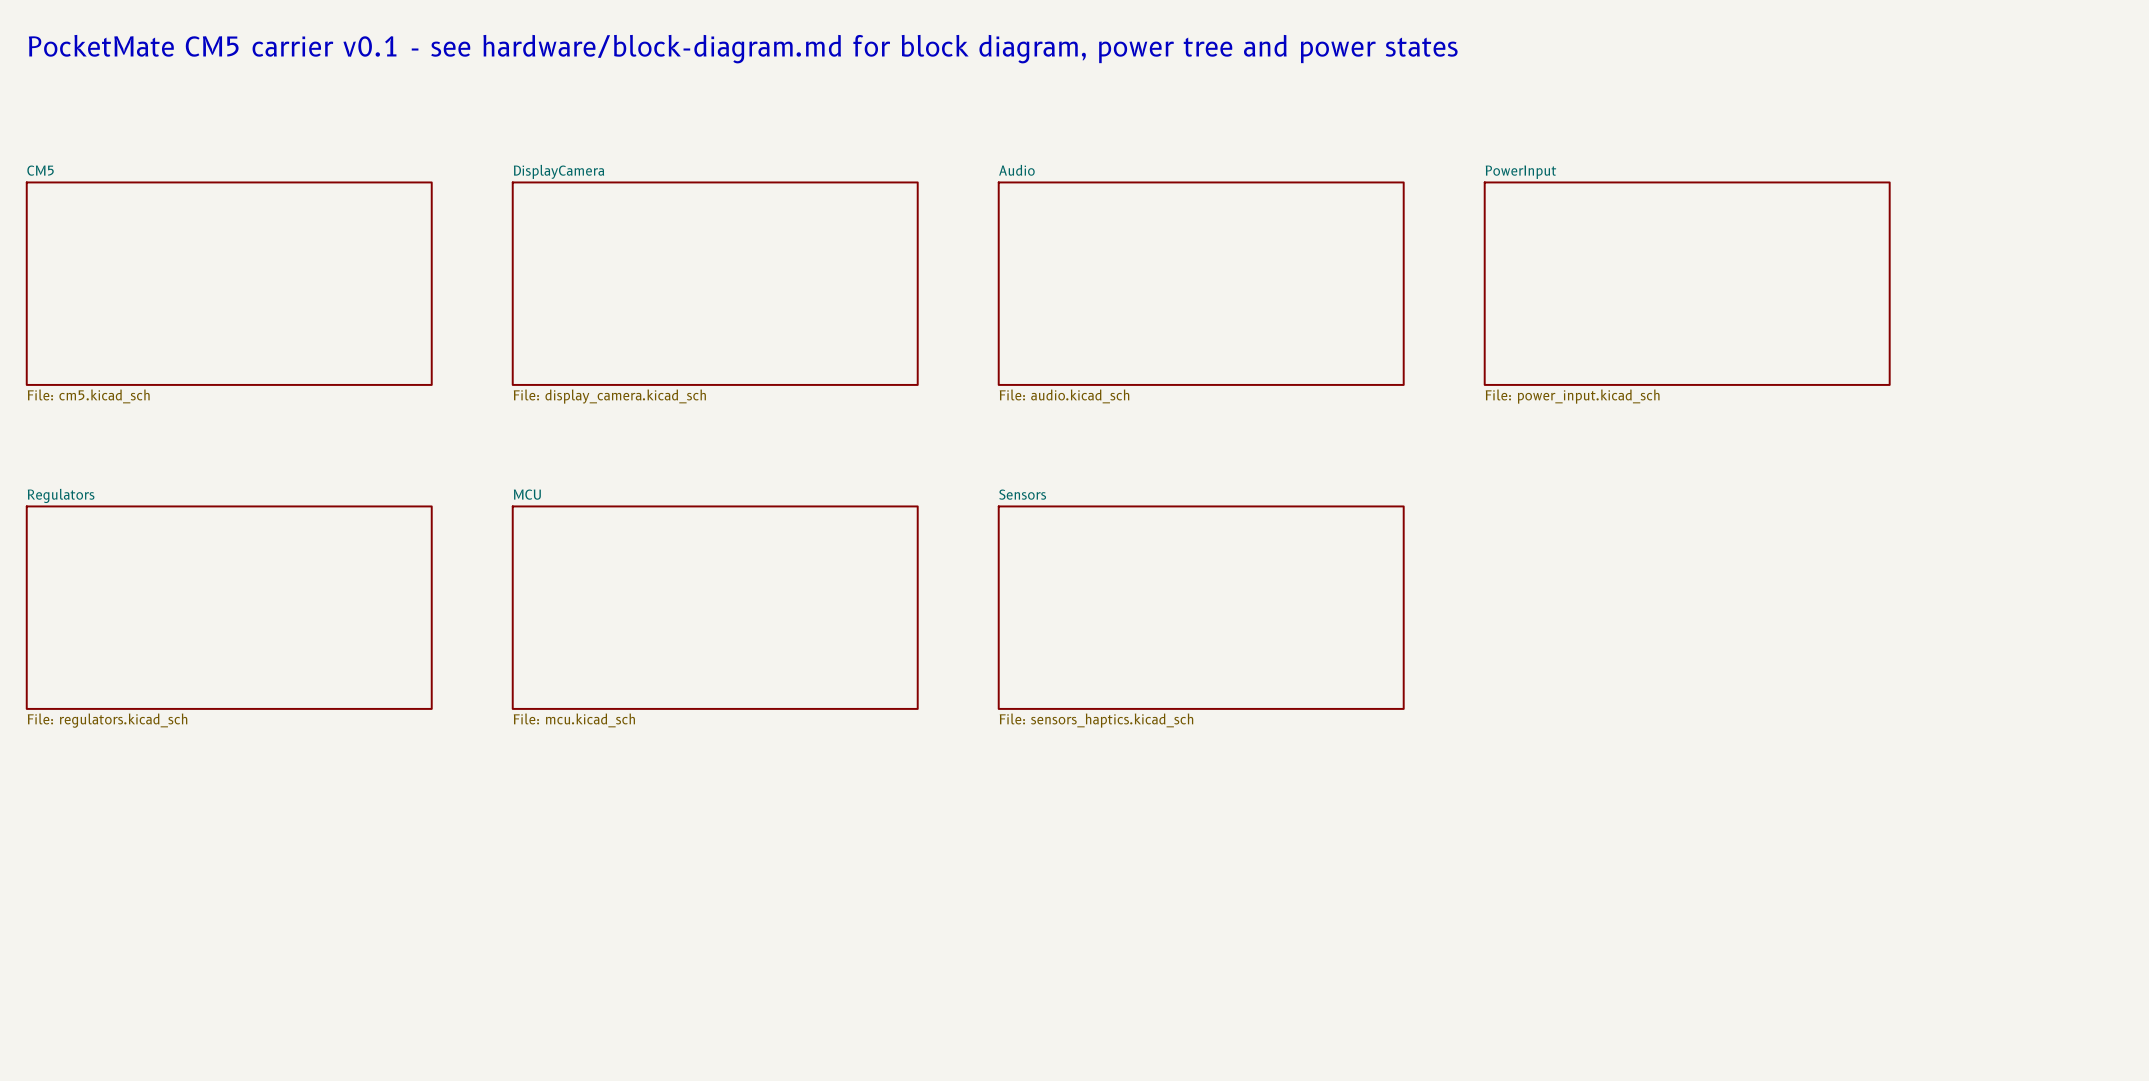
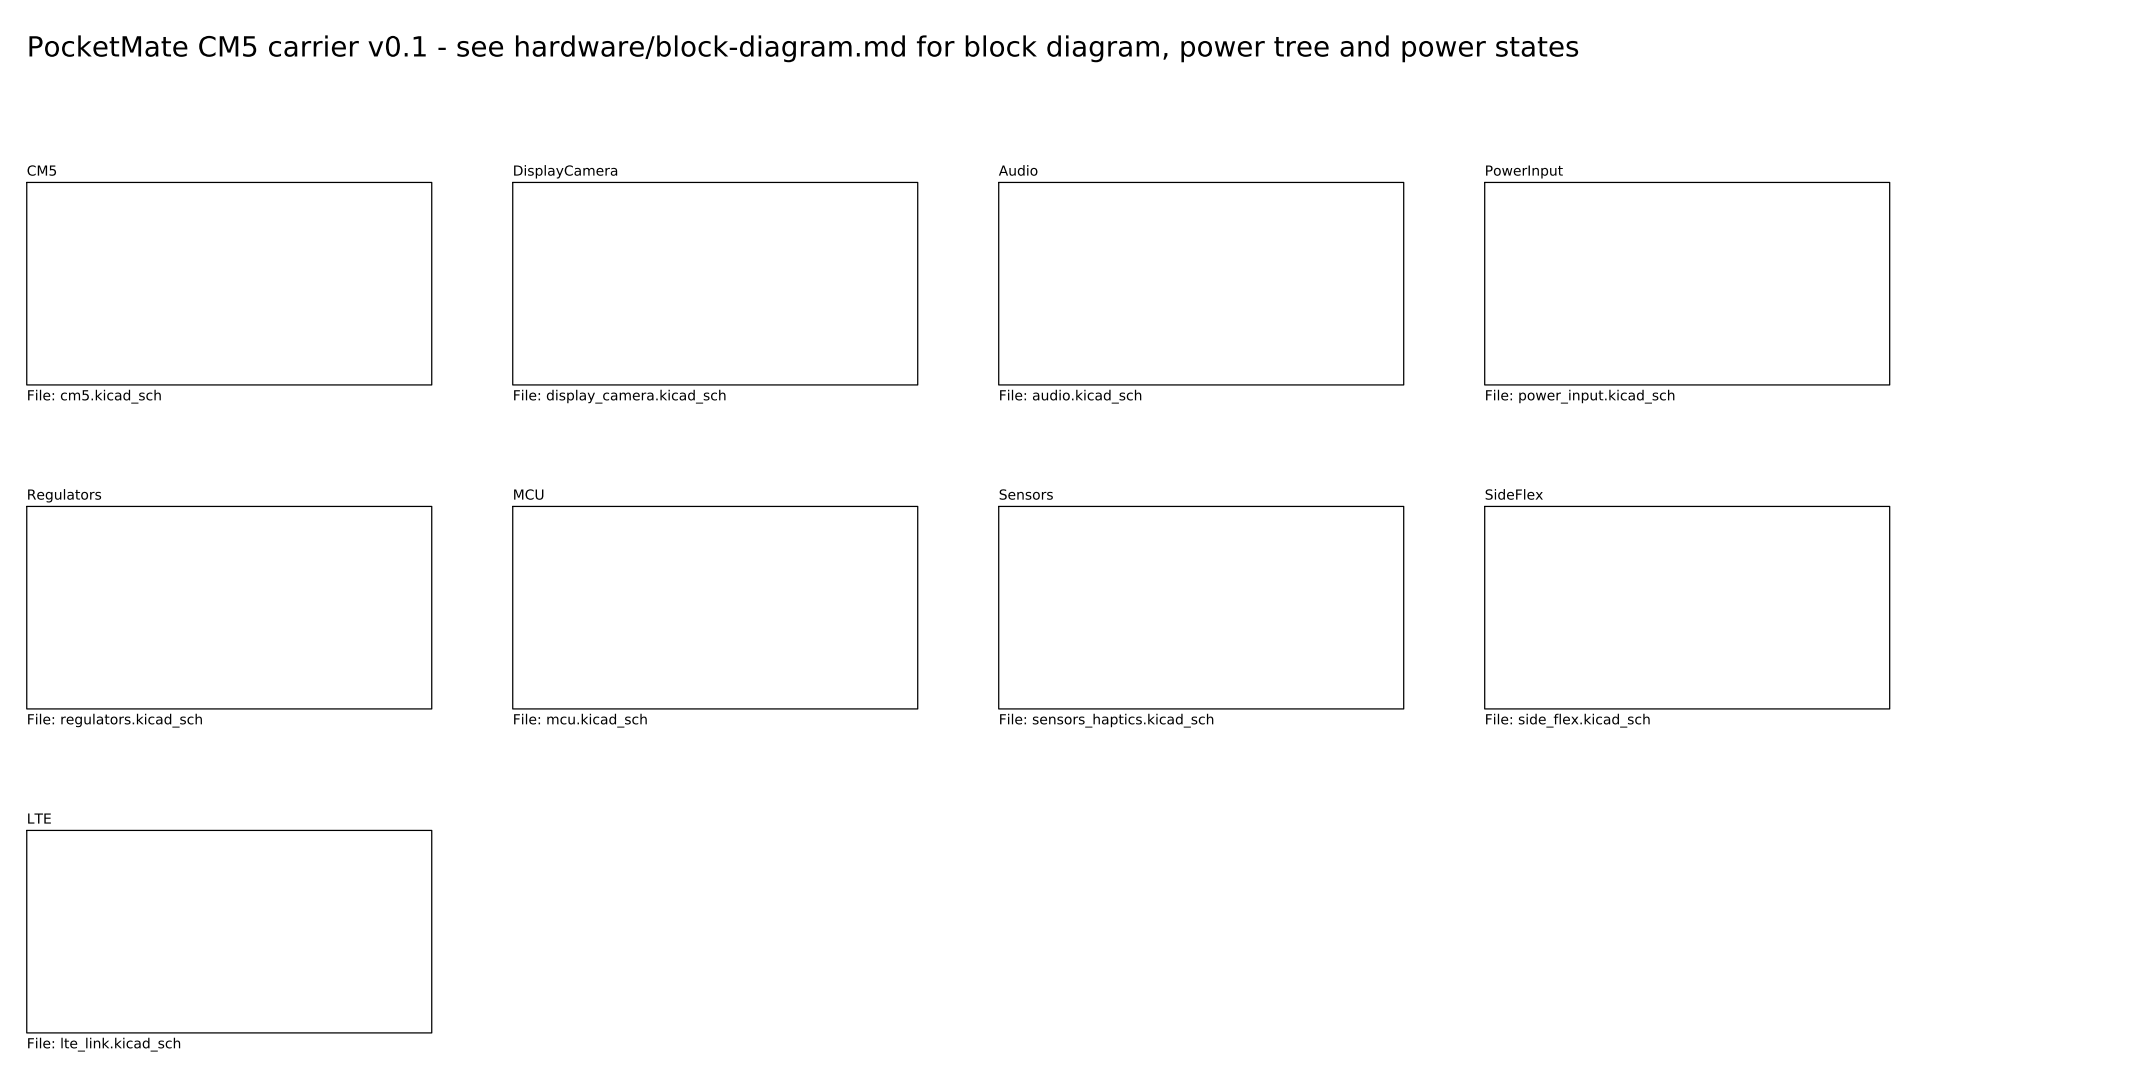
sheet SideFlex: none -> File: side_flex.kicad_sch (1687, 607)
sheet LTE: none -> File: lte_link.kicad_sch (229, 931)

